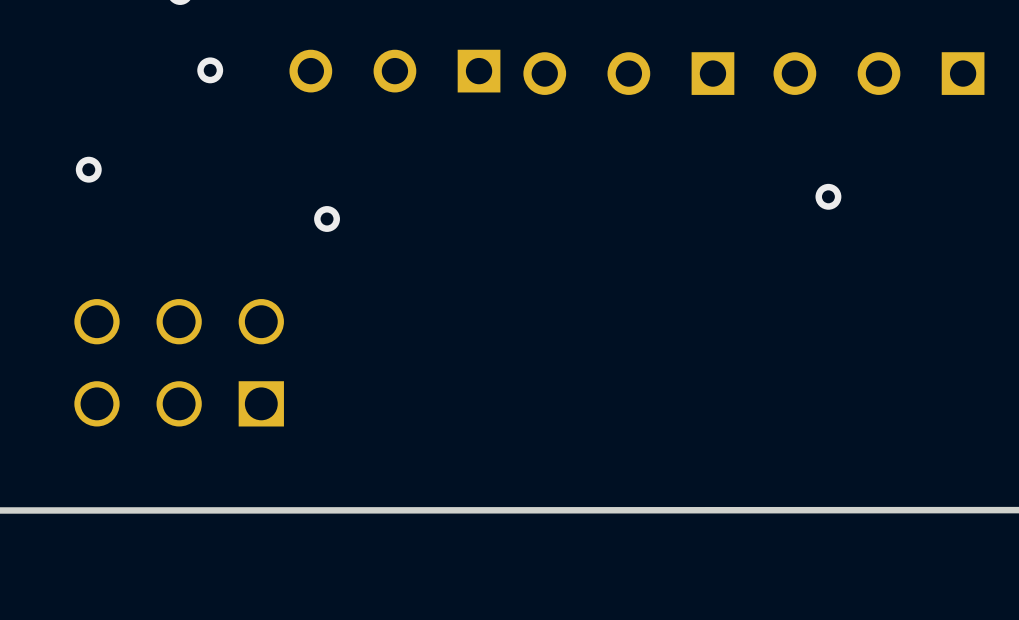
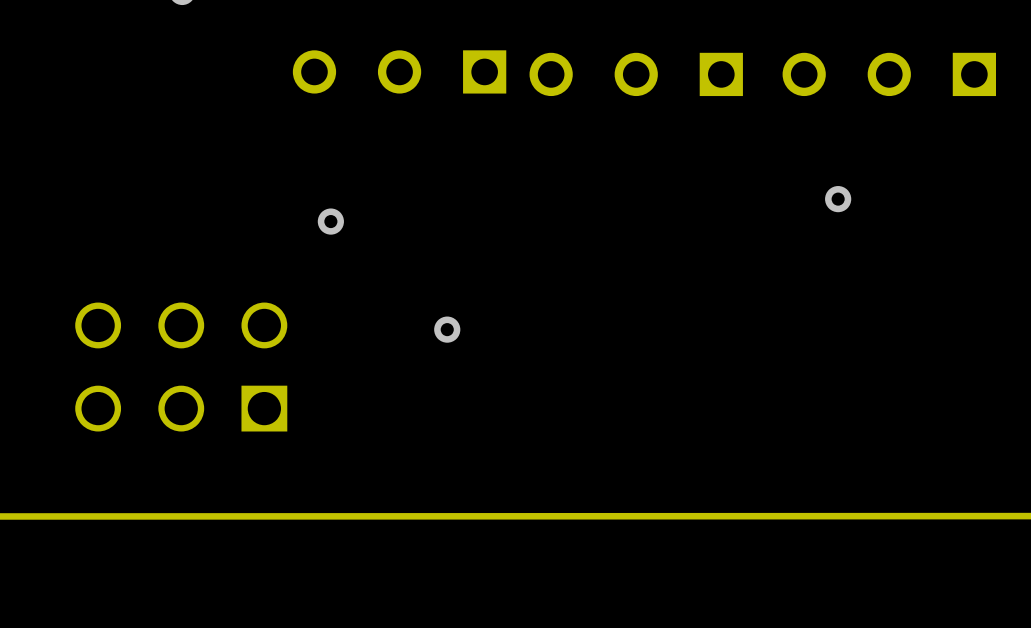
via: (210, 70) -> none
via: (88, 169) -> none
via: none -> (447, 329)

